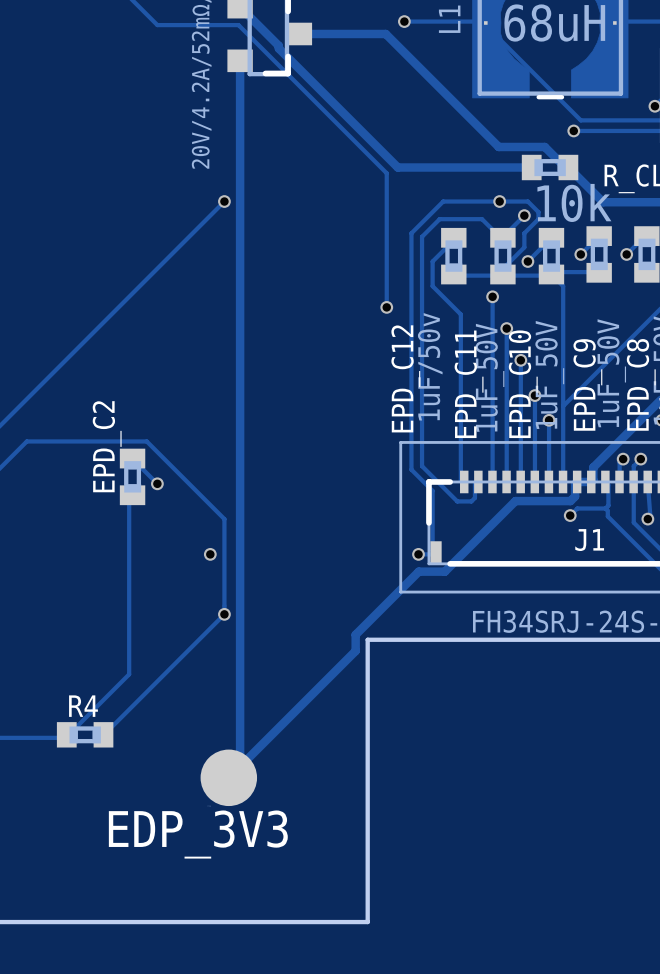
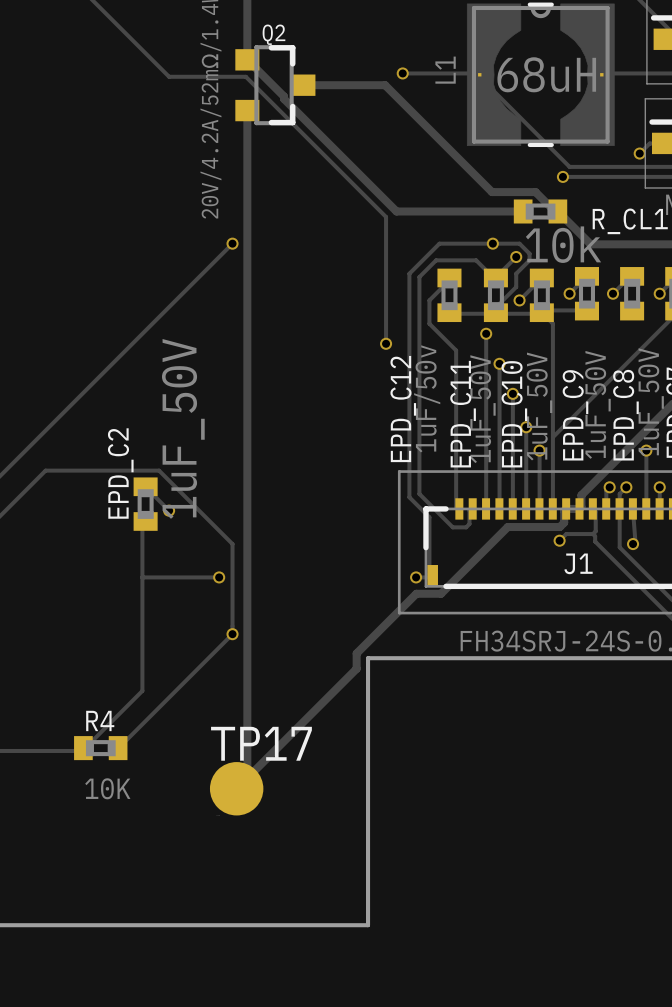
EPD_C2 value: none -> 1uF_50V (183, 428)
track: none -> (142, 577) (219, 577)
R4 value: none -> 10K (107, 788)
EDP_3V3 name: EDP_3V3 (198, 834) -> TP17 (261, 743)

